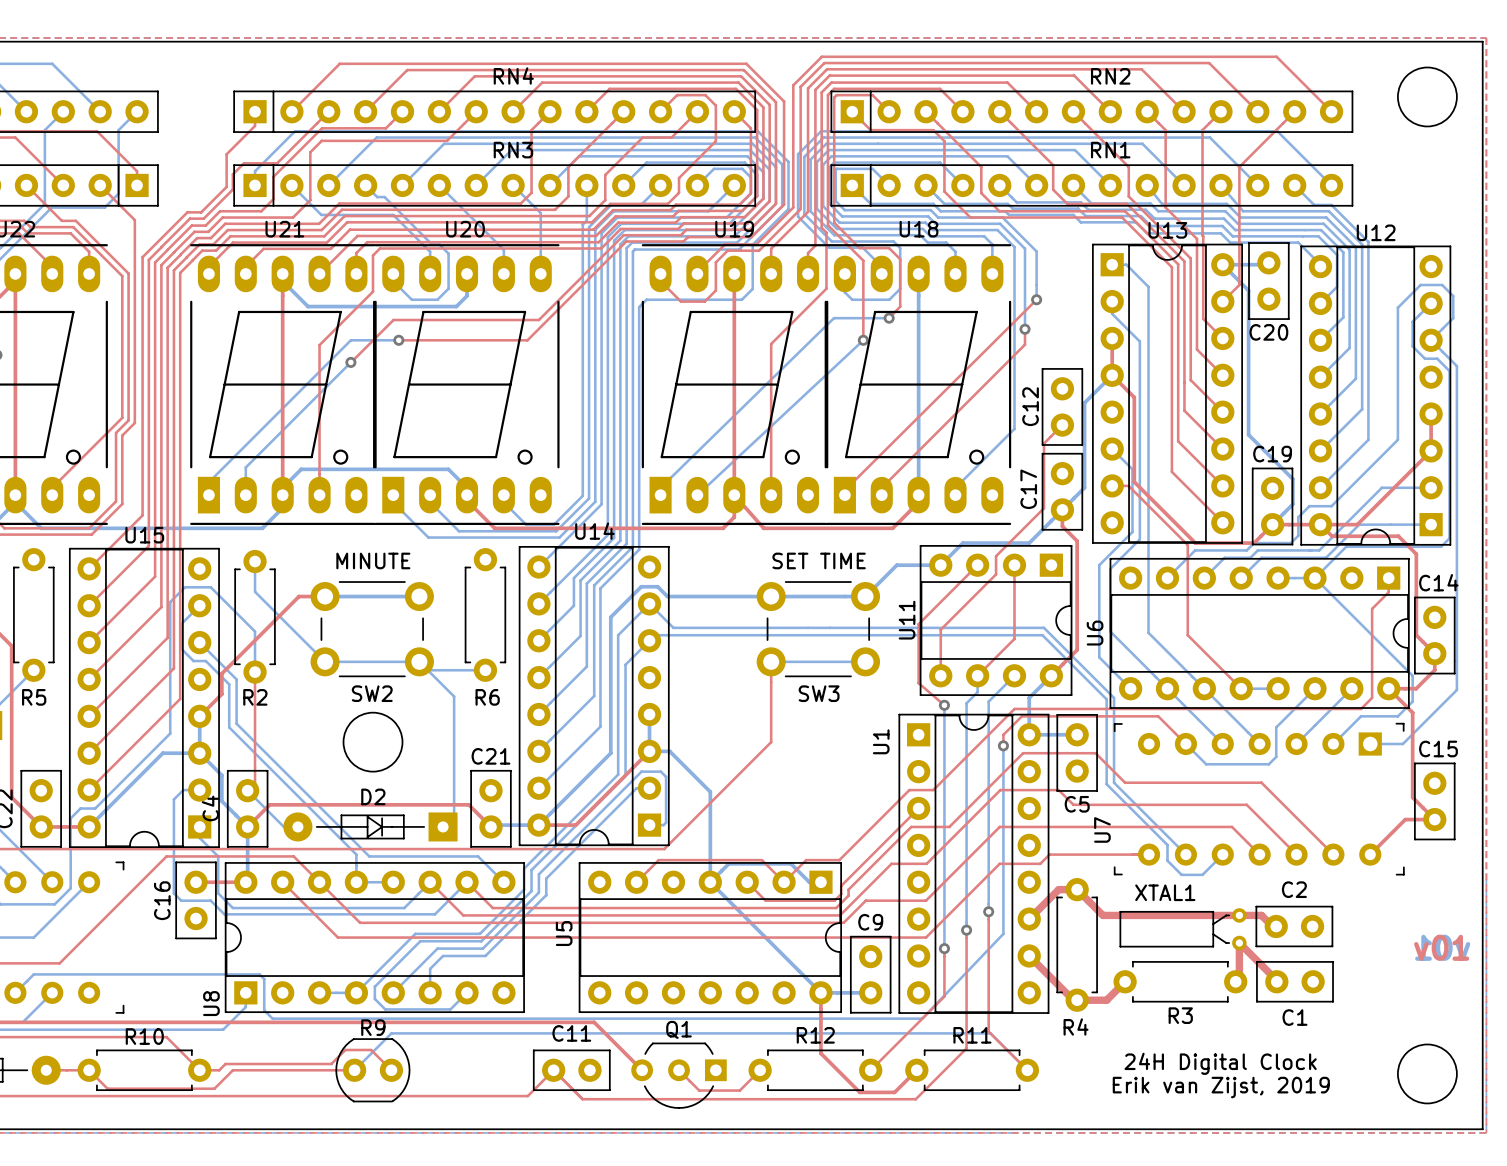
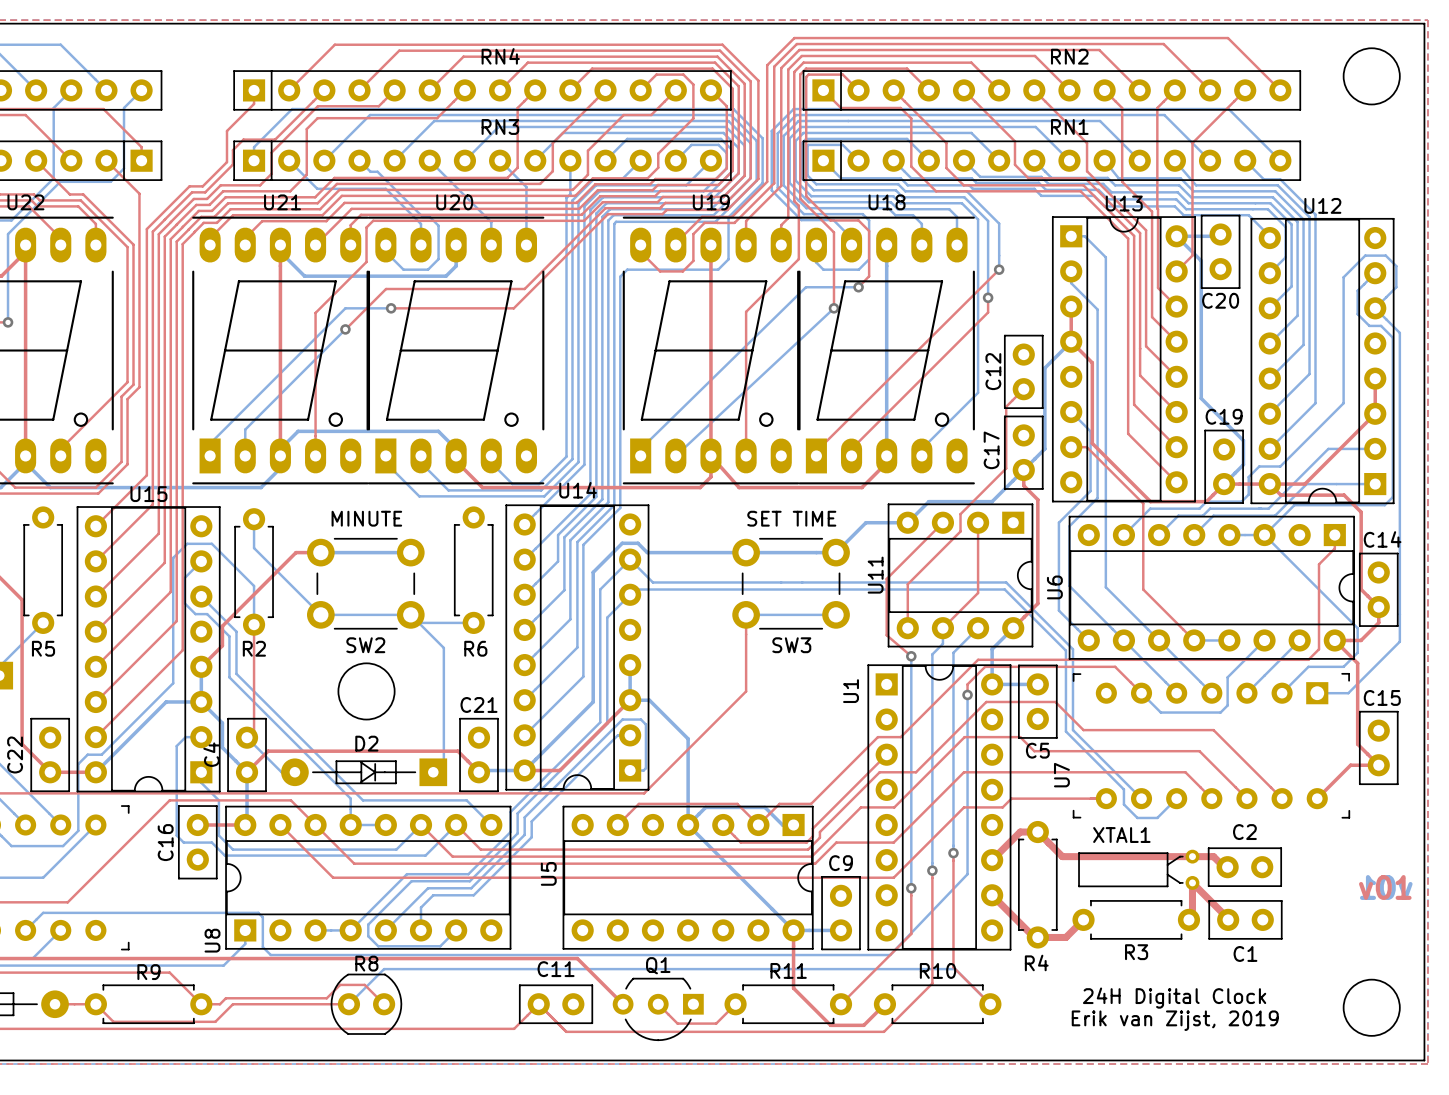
R9 name: R9 (373, 1027) -> R8 (366, 963)
R12 name: R12 (815, 1035) -> R11 (788, 970)
R11 name: R11 (972, 1035) -> R10 (937, 970)
R10 name: R10 (144, 1036) -> R9 (148, 972)

